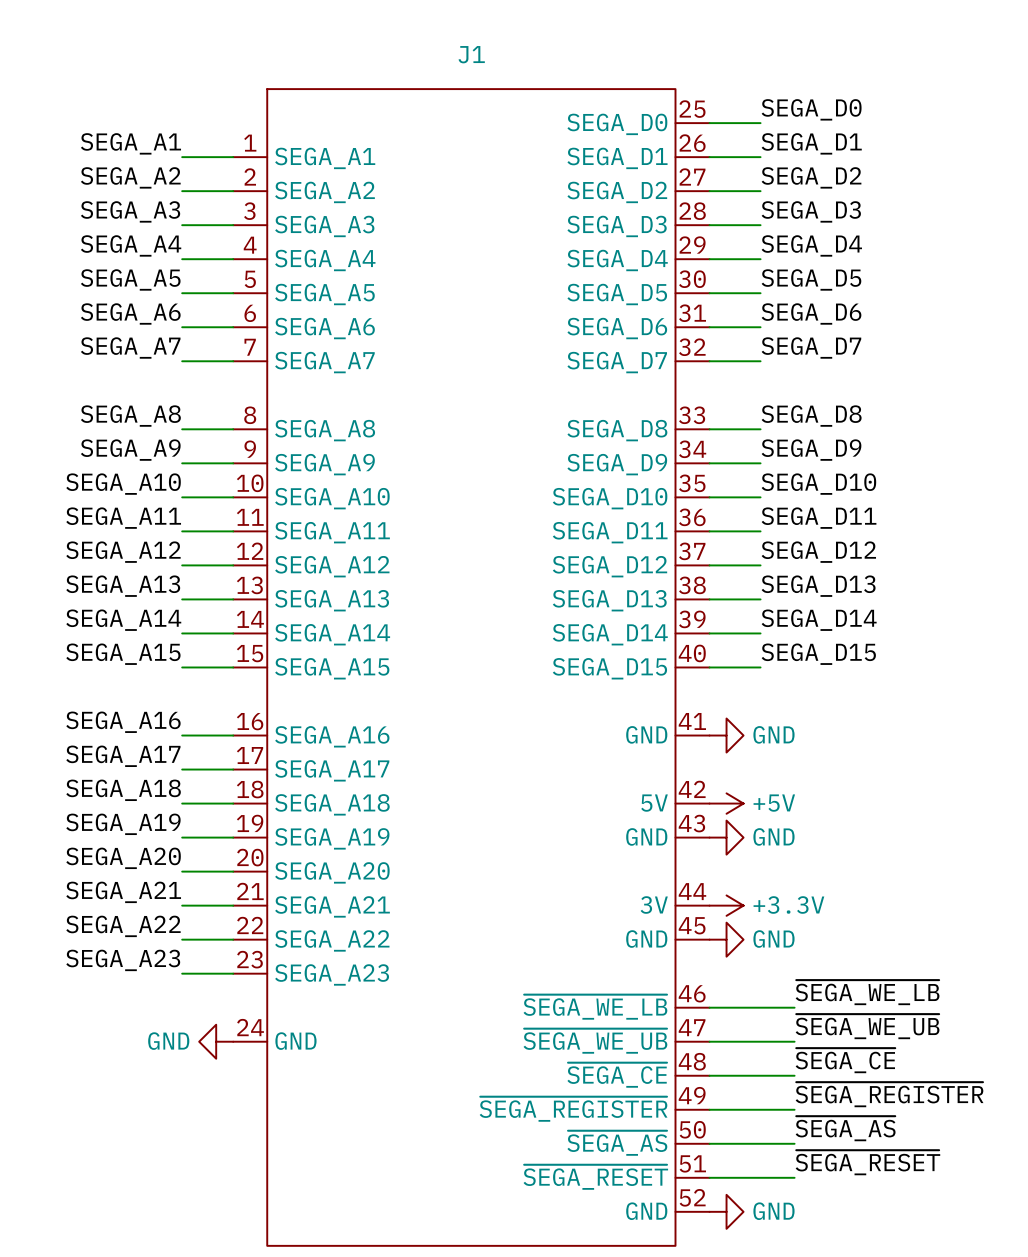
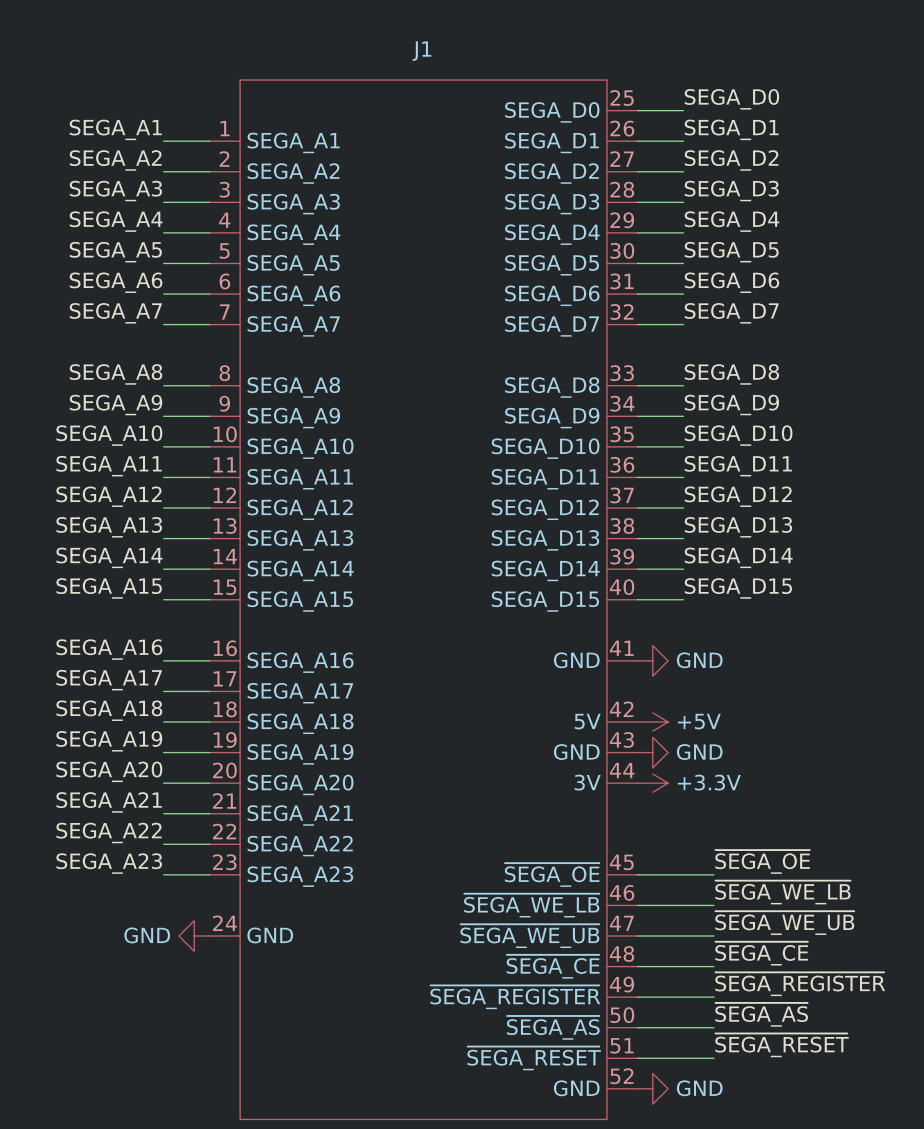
J1 symbol: [233, 89, 710, 1246] -> [209, 80, 638, 1120]
power symbol position: +3.3V (726, 905) -> +3.3V (652, 783)
power symbol: GND (726, 939) -> none
label: none -> ~{SEGA_OE} (762, 861)
wire: none -> (637, 874) (713, 874)

